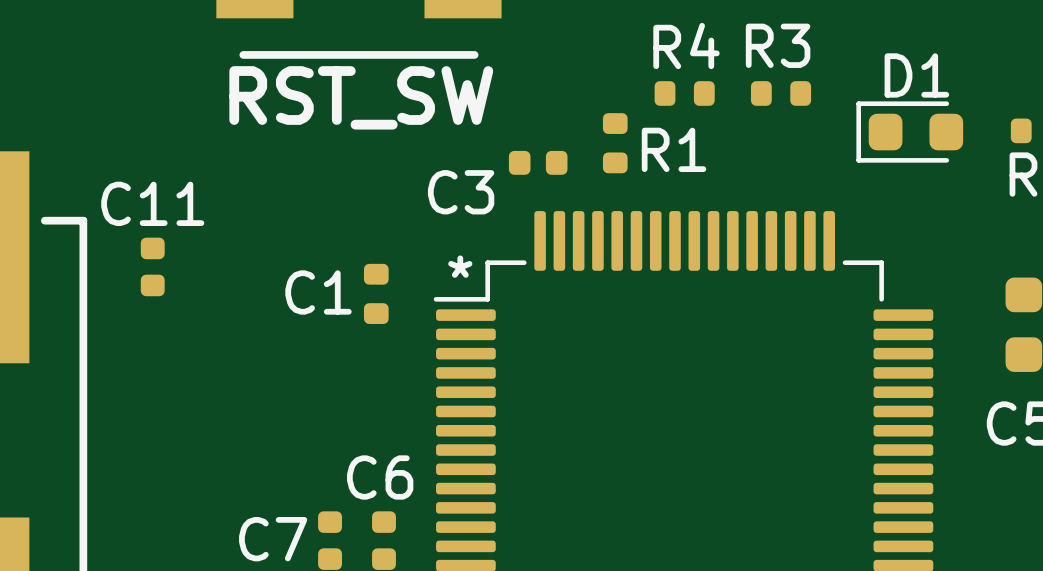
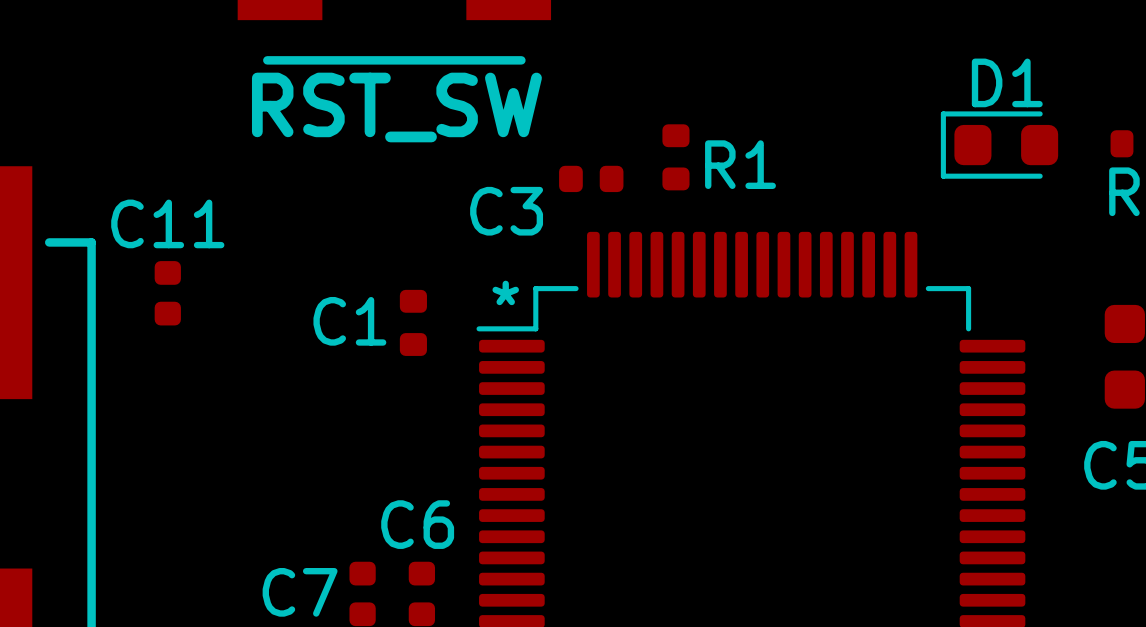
R4: (684, 93) -> none
R3: (781, 93) -> none

